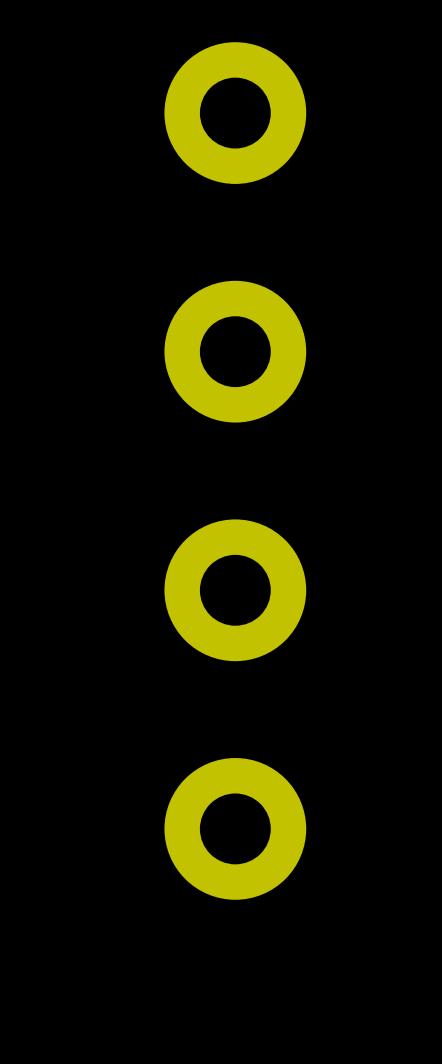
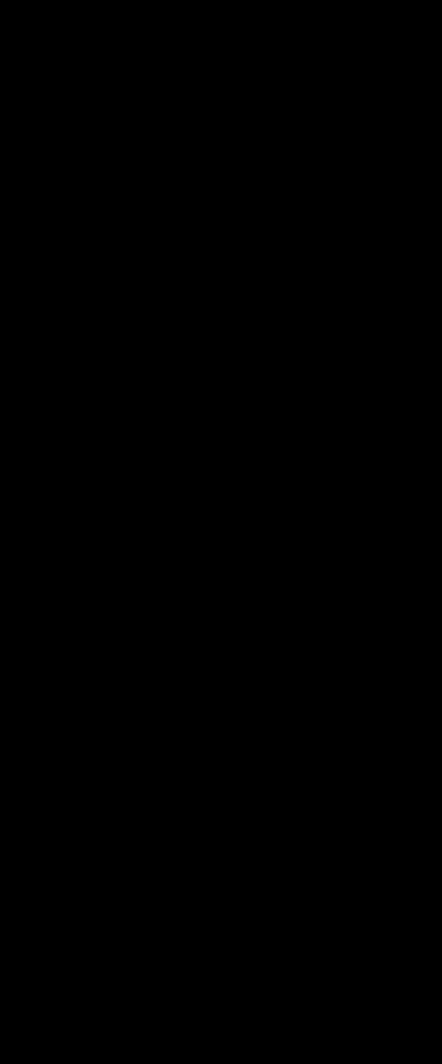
part: (235, 113) -> none
part: (235, 351) -> none
part: (235, 590) -> none
part: (235, 828) -> none

